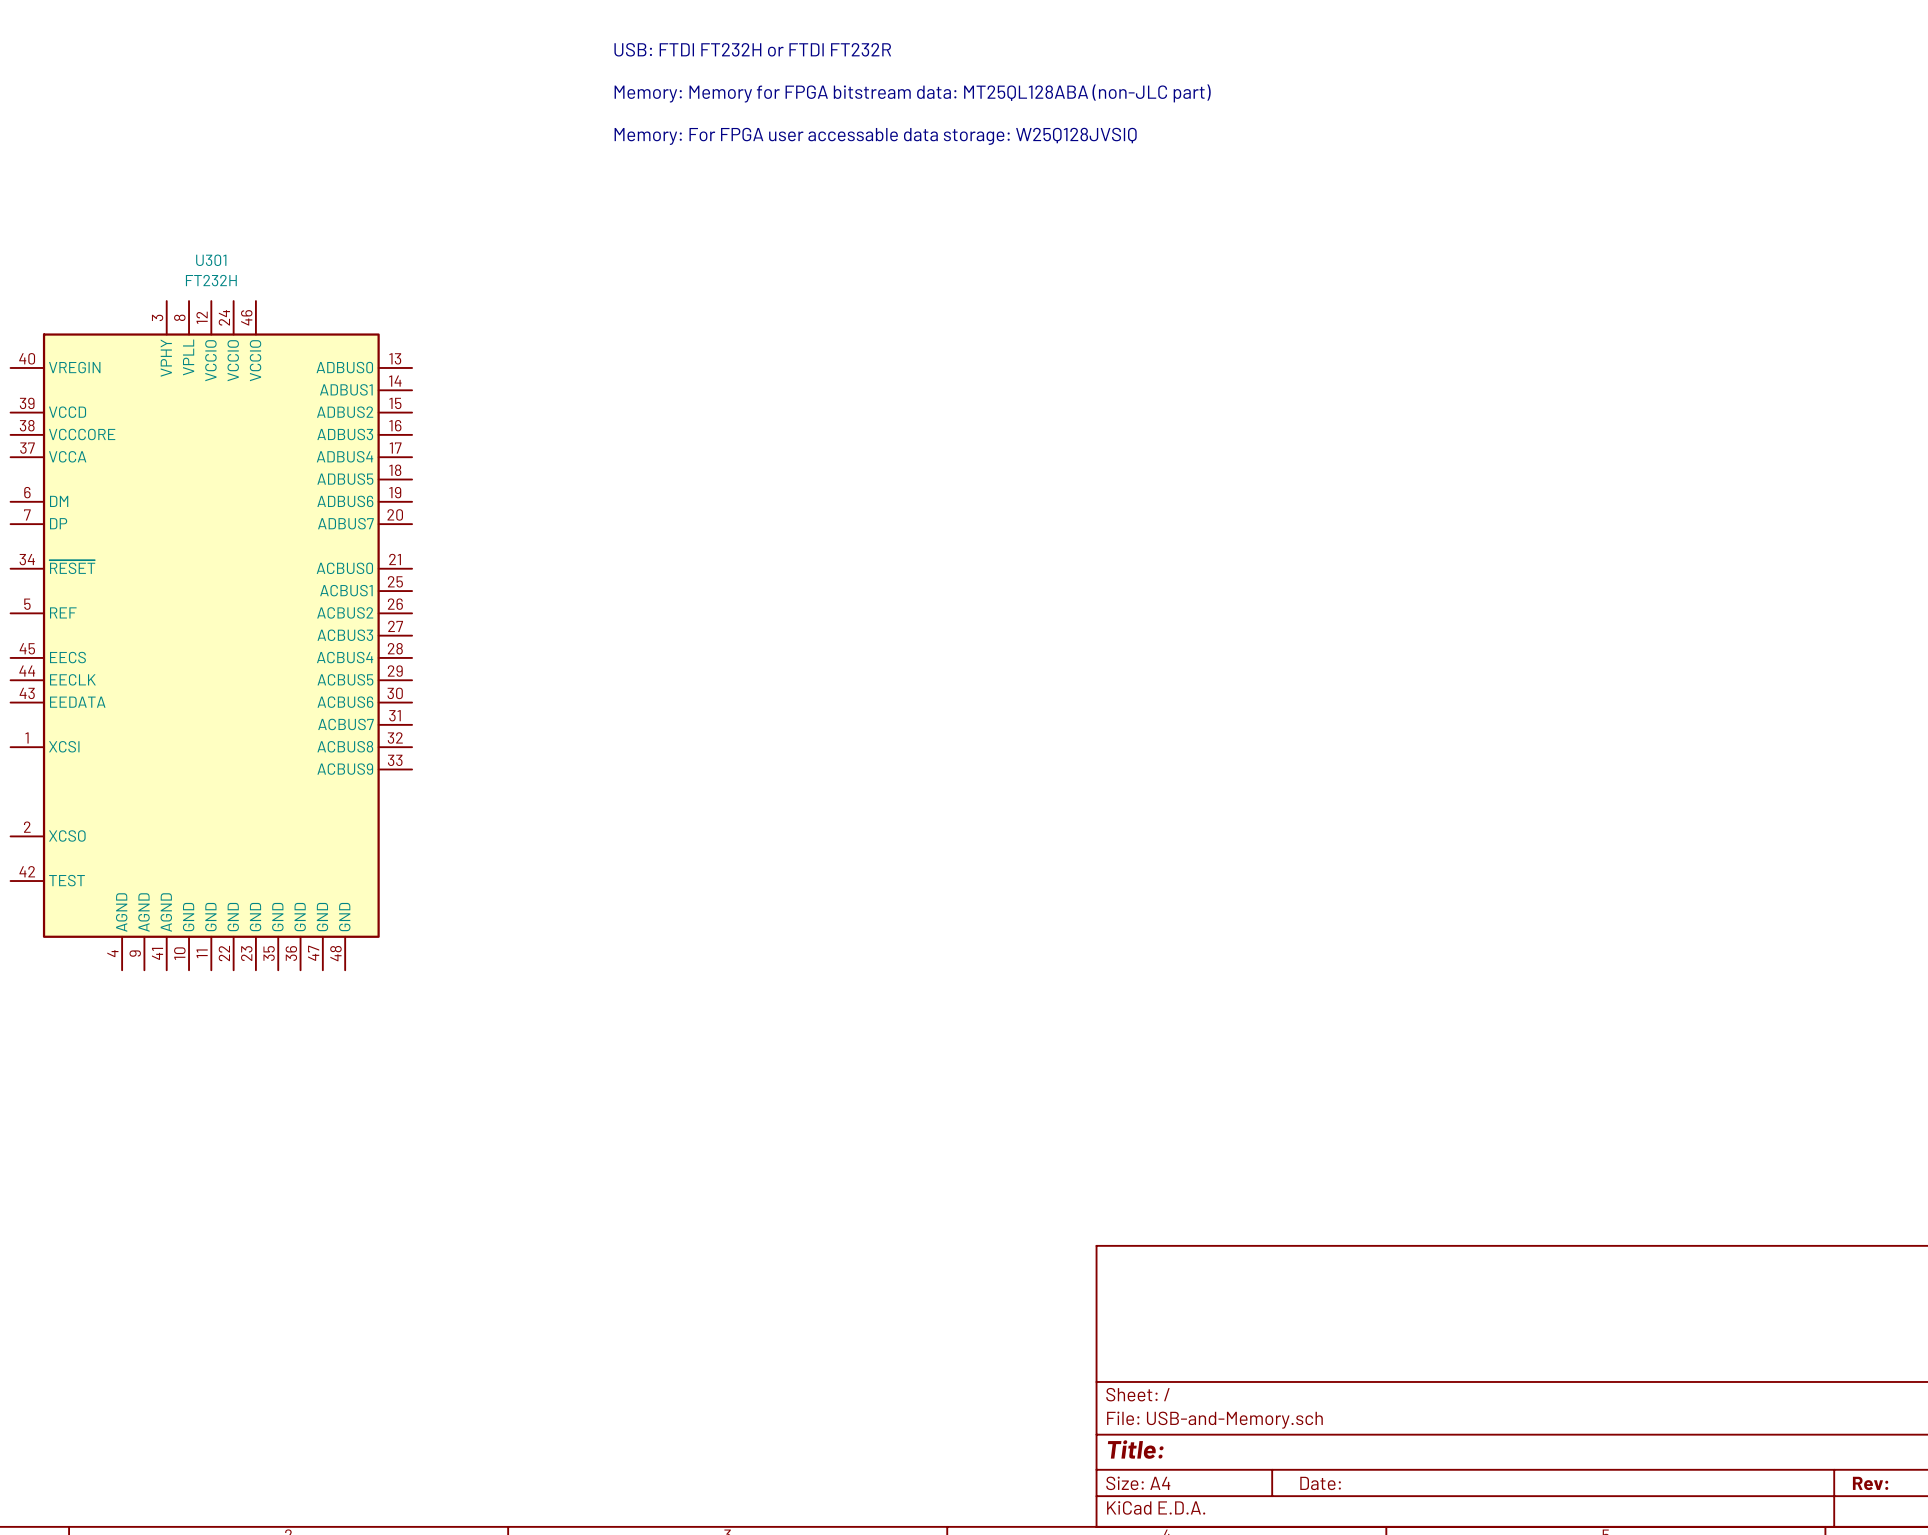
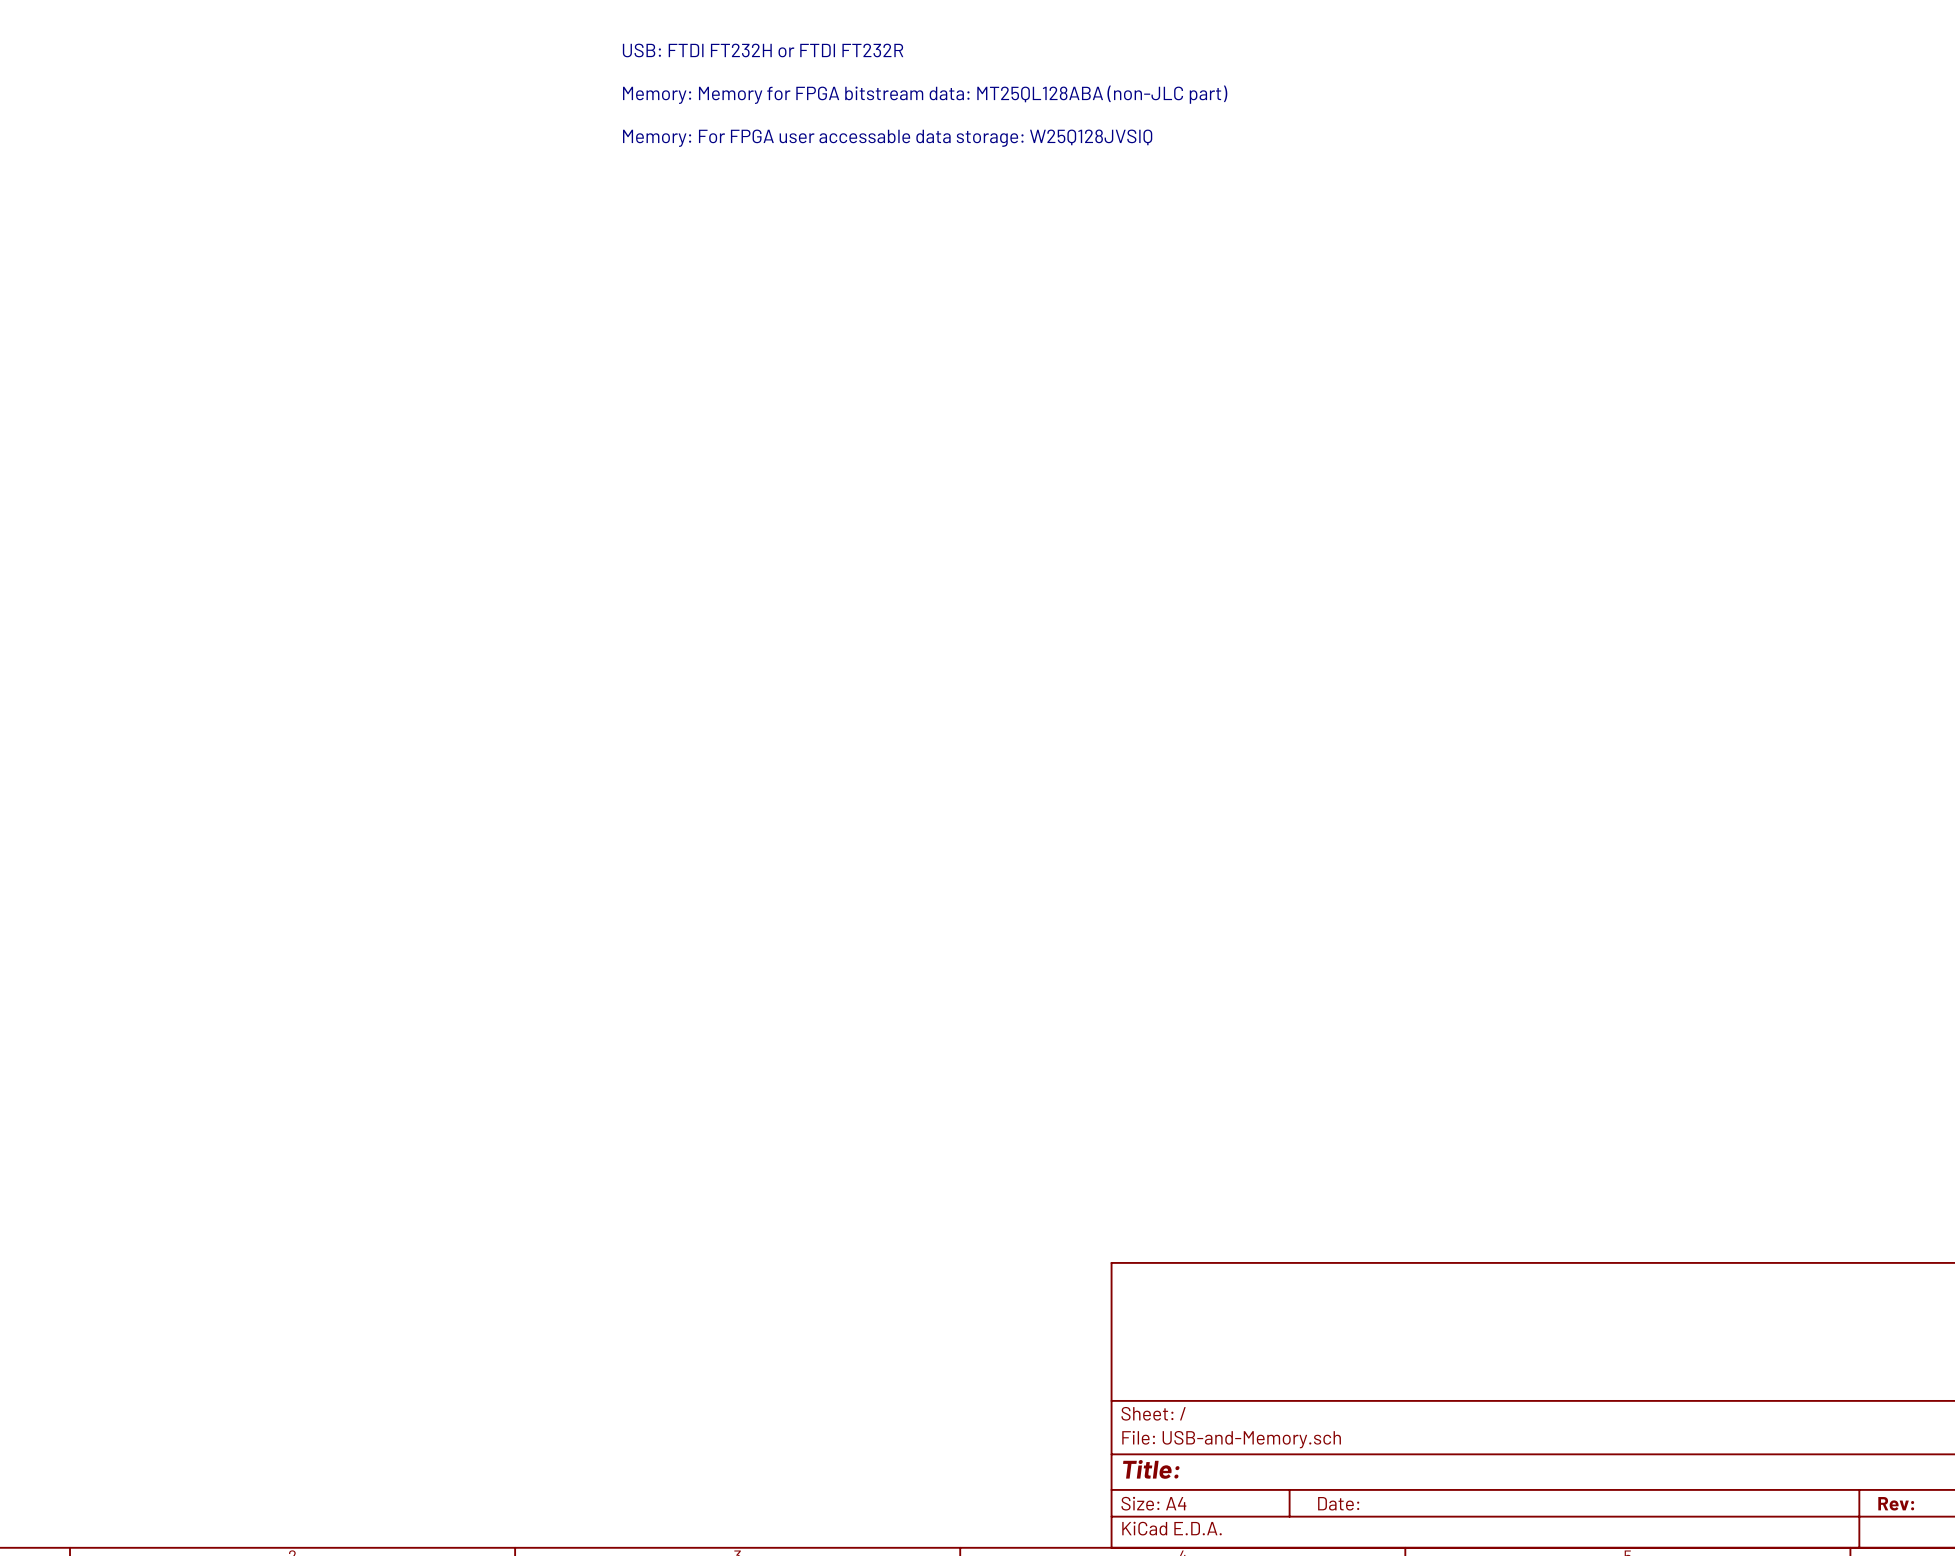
U301: FT232H (211, 635) -> none

